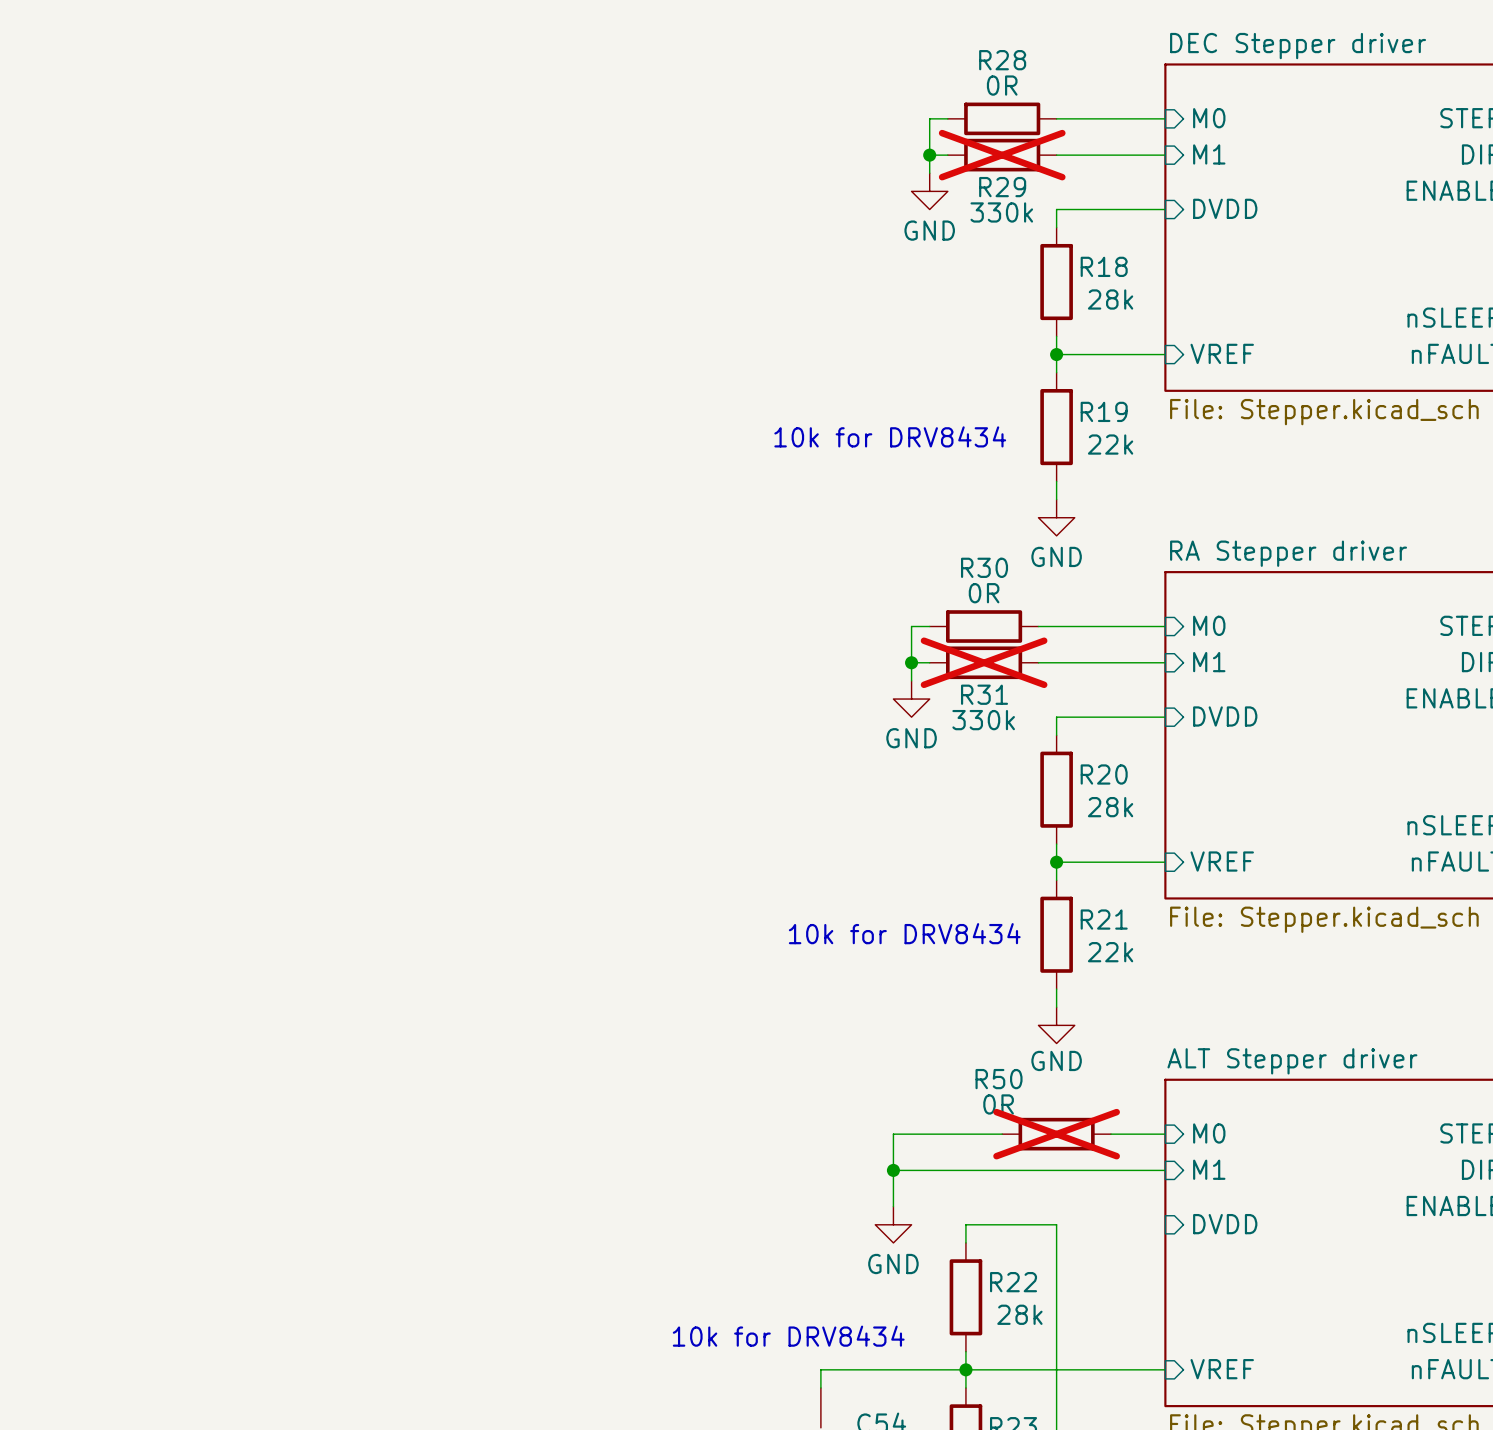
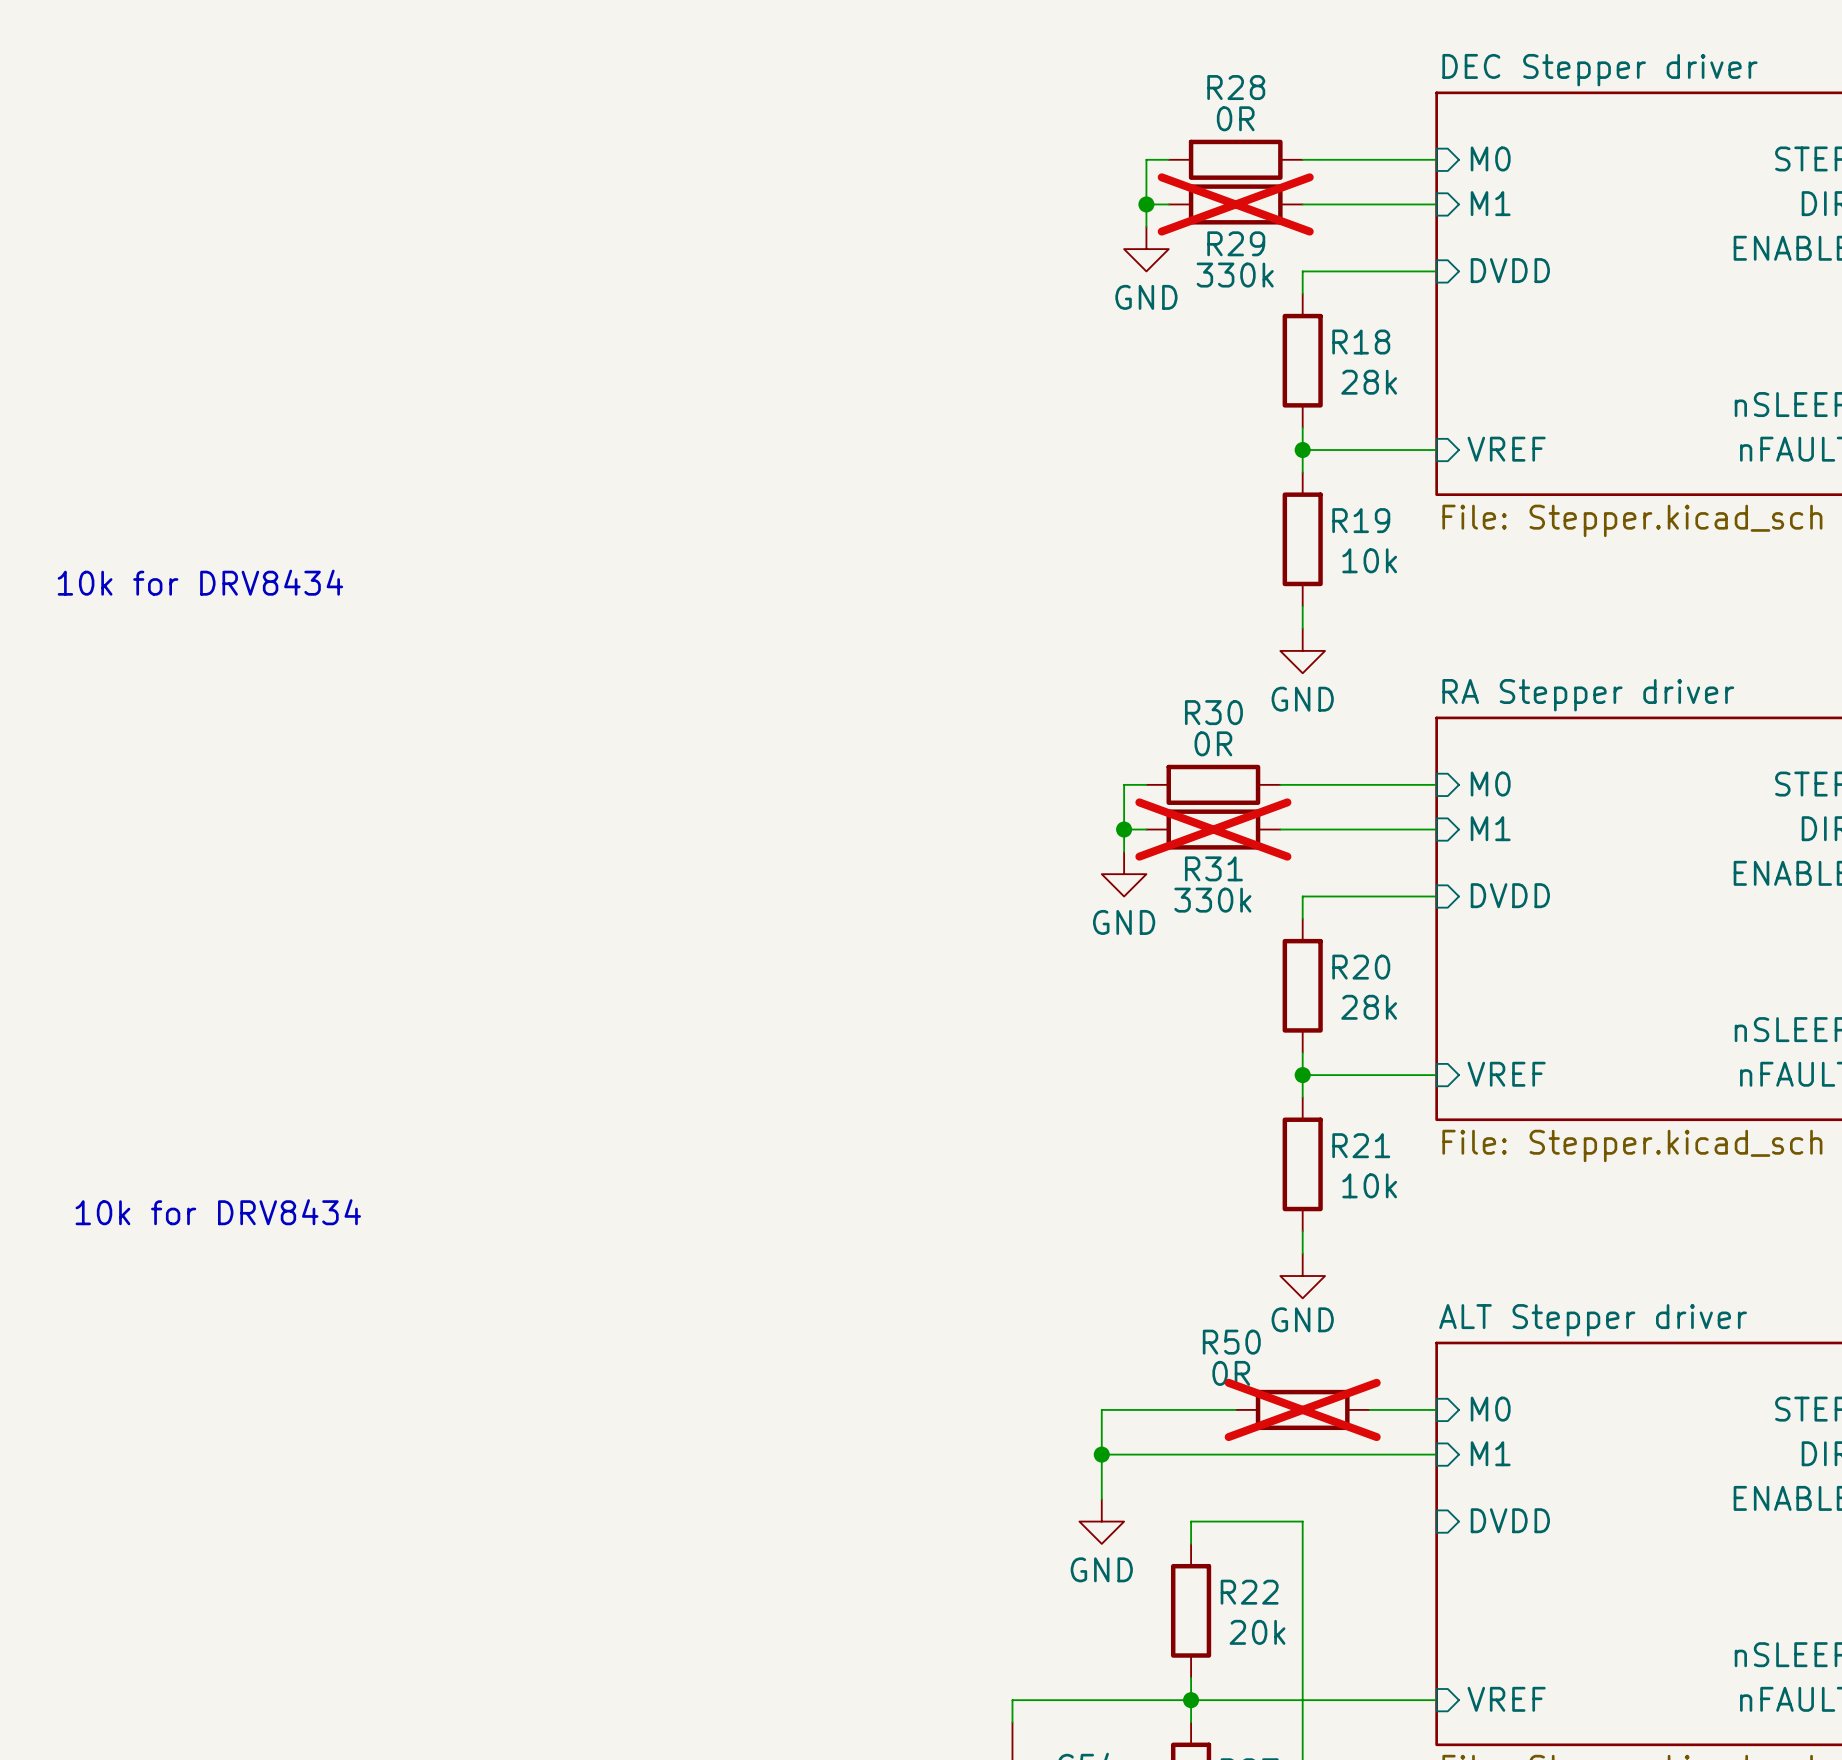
text: 10k for DRV8434 (890, 436) -> none
R19 value: 22k (1110, 444) -> 10k (1369, 560)
text: none -> 10k for DRV8434 (200, 582)
text: 10k for DRV8434 (904, 933) -> none
R21 value: 22k (1110, 952) -> 10k (1369, 1185)
text: none -> 10k for DRV8434 (218, 1212)
R22 value: 28k (1019, 1314) -> 20k (1257, 1632)
text: 10k for DRV8434 (788, 1336) -> none

